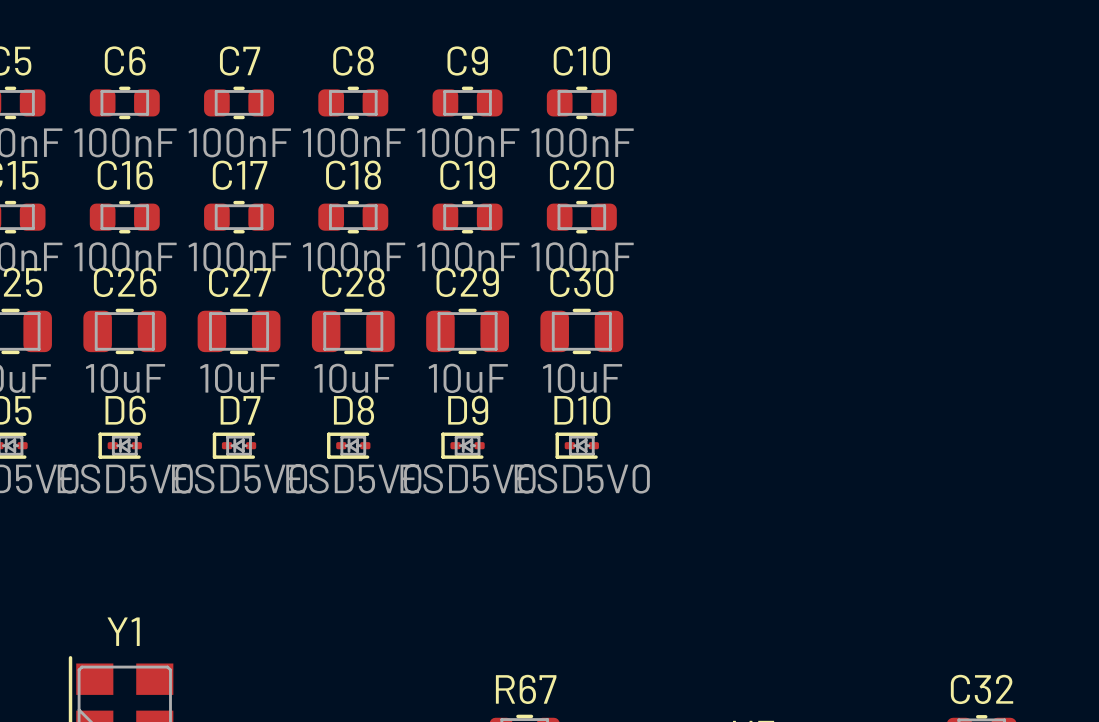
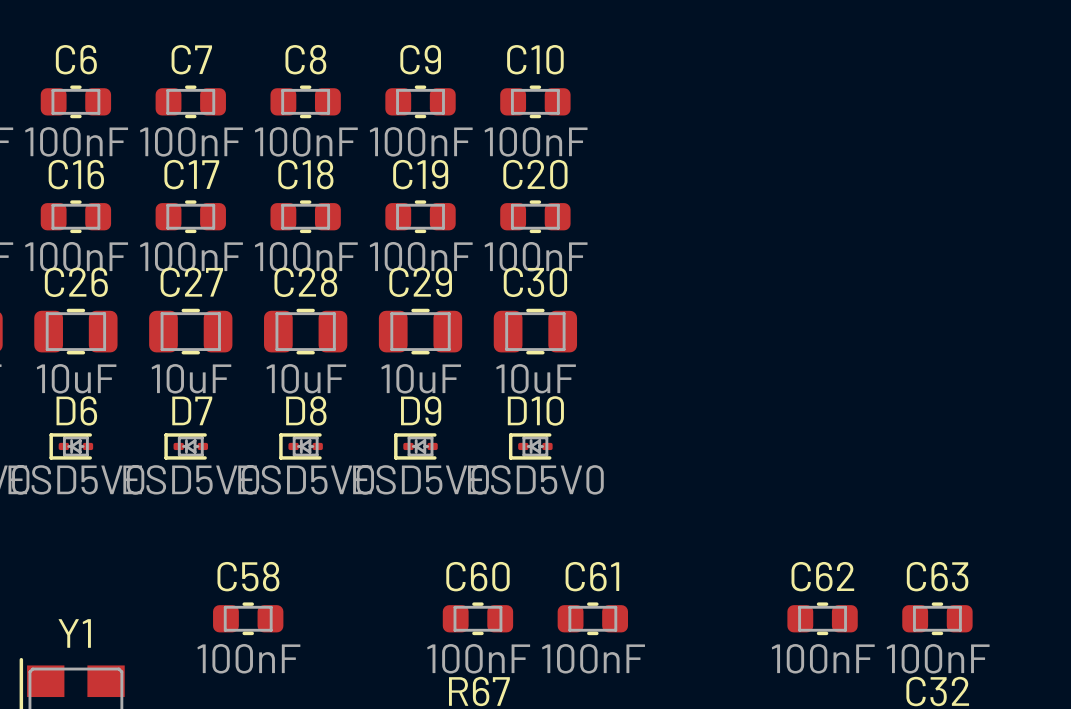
C58: none -> 100nF (248, 618)
C60: none -> 100nF (477, 618)
C61: none -> 100nF (592, 618)
C62: none -> 100nF (822, 618)
C63: none -> 100nF (937, 618)

